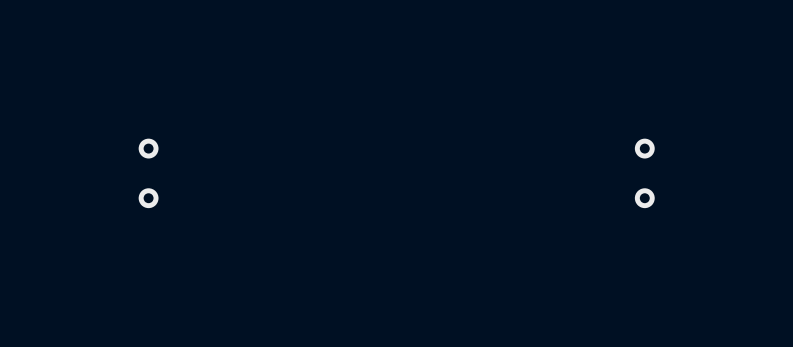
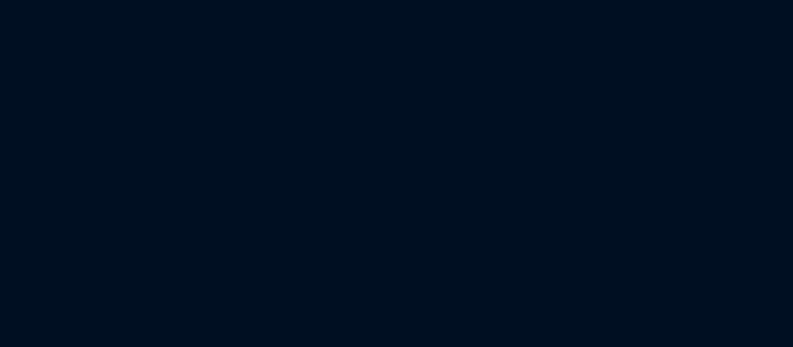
via: (148, 148) -> none
via: (644, 148) -> none
via: (148, 198) -> none
via: (644, 198) -> none

